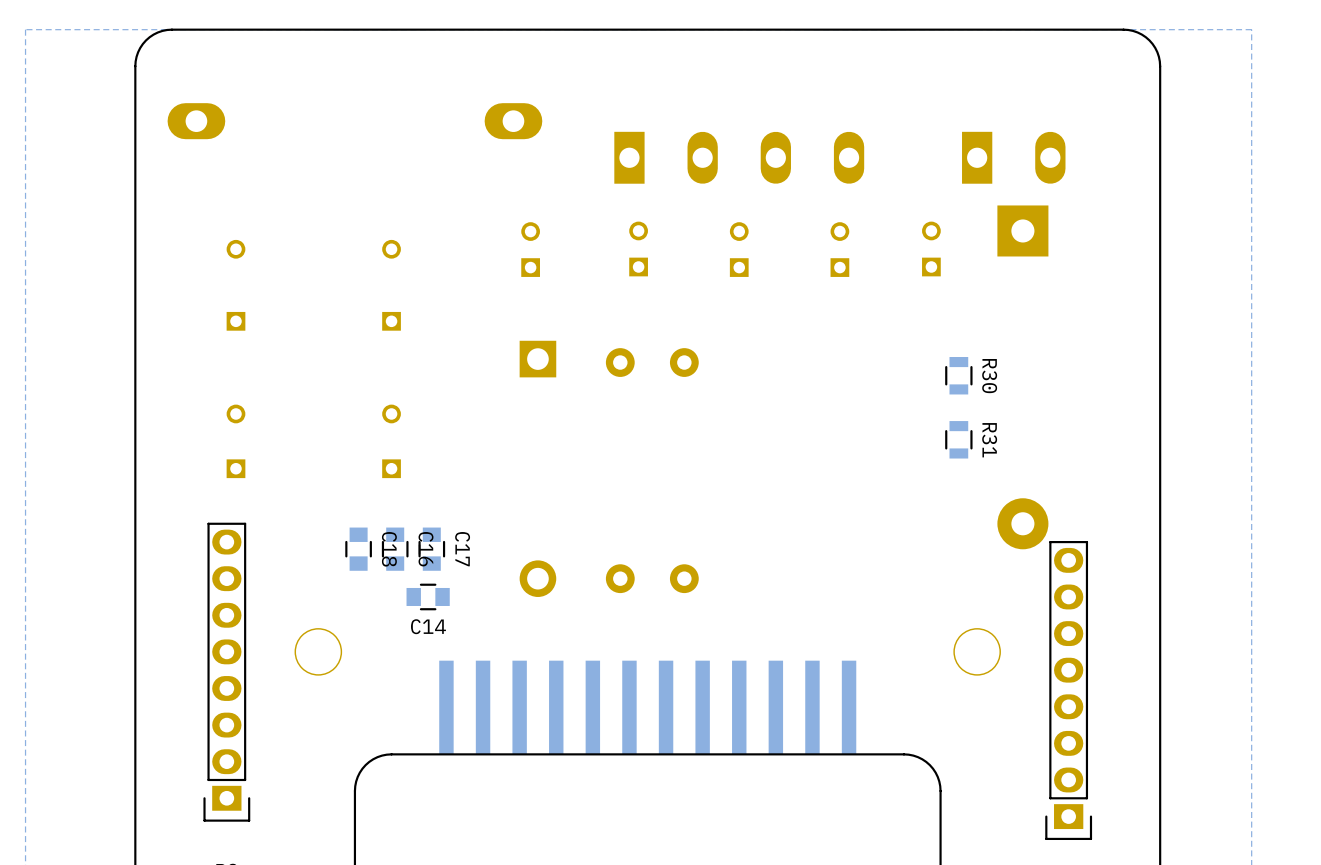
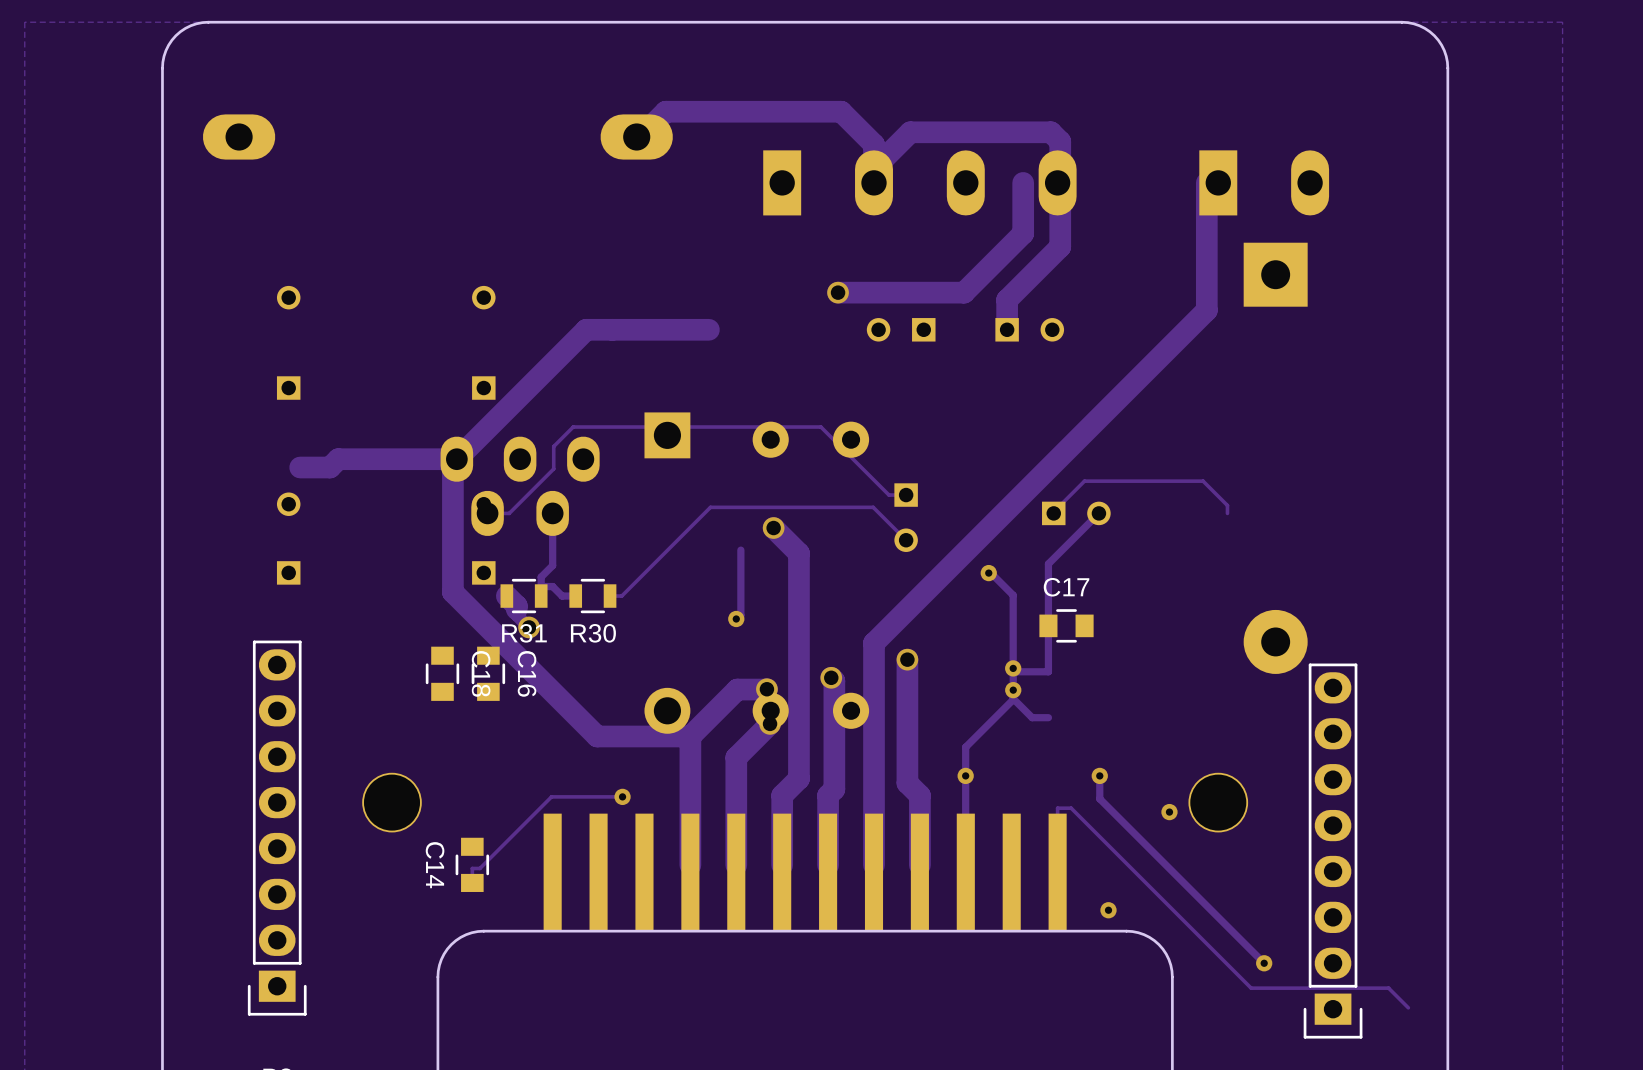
track: none -> (640, 136) (665, 111) (841, 111) (874, 144) (874, 182)
track: none -> (874, 168) (910, 132) (1050, 132) (1060, 141) (1060, 246) (1007, 299) (1007, 329)
track: none -> (1023, 182) (1023, 233) (964, 292) (838, 292)
track: none -> (1206, 182) (1206, 310) (874, 643) (874, 865)
via: none -> (838, 292)
part: (638, 248) -> none
part: (931, 248) -> none
part: (530, 249) -> none
part rotation: 0° (739, 249) -> 90° counterclockwise (901, 329)
part rotation: 0° (839, 249) -> 90° clockwise (1029, 329)
track: none -> (708, 329) (586, 329) (452, 463) (452, 592) (597, 736) (690, 736)
R30 rotation: 0° (958, 375) -> 90° clockwise (592, 596)
R30 position: (958, 375) -> (592, 596)
track: none -> (456, 459) (338, 459) (330, 467) (300, 467)
part: none -> (520, 486)
track: none -> (906, 495) (888, 495) (820, 427) (573, 427) (553, 446) (553, 468) (509, 513) (487, 513)
track: none -> (552, 513) (552, 565) (541, 577) (541, 596)
part: none -> (1076, 513)
track: none -> (1098, 513) (1048, 563) (1048, 671) (1016, 671) (1013, 668)
track: none -> (1227, 513) (1227, 505) (1203, 481) (1084, 481) (1053, 513)
part: none -> (906, 517)
track: none -> (773, 528) (798, 553) (798, 778) (782, 795) (782, 865)
via: none -> (773, 528)
R31 rotation: 0° (958, 439) -> 90° clockwise (524, 596)
R31 position: (958, 439) -> (524, 596)
track: none -> (906, 540) (873, 507) (710, 507) (621, 596) (610, 596)
track: none -> (740, 550) (740, 615) (736, 618)
track: none -> (988, 573) (1013, 595) (1013, 699) (965, 747) (965, 865)
via: none -> (988, 573)
track: none -> (541, 586) (552, 586) (562, 596) (575, 596)
track: none -> (506, 596) (516, 605) (516, 615) (529, 627)
via: none -> (736, 618)
via: none -> (529, 627)
track: none -> (907, 659) (907, 783) (919, 795) (919, 865)
via: none -> (907, 659)
via: none -> (1013, 668)
C17 rotation: 0° (431, 549) -> 90° clockwise (1066, 625)
C17 position: (431, 549) -> (1066, 625)
C17 name position: C17 (462, 549) -> C17 (1066, 587)
track: none -> (831, 677) (834, 680) (834, 789) (828, 795) (828, 865)
via: none -> (831, 677)
track: none -> (766, 689) (737, 689) (690, 736)
via: none -> (766, 689)
via: none -> (1013, 690)
track: none -> (1013, 698) (1032, 717) (1048, 717)
track: none -> (770, 723) (736, 757) (736, 865)
via: none -> (770, 723)
C14 rotation: 0° (428, 596) -> 90° clockwise (472, 864)
C14 position: (428, 596) -> (472, 864)
track: none -> (690, 736) (690, 865)
via: none -> (965, 775)
track: none -> (1099, 775) (1099, 798) (1264, 963)
via: none -> (1099, 775)
track: none -> (622, 796) (551, 796) (479, 868) (472, 868) (472, 882)
via: none -> (622, 796)
via: none -> (1169, 812)
track: none -> (1057, 865) (1057, 808) (1071, 808) (1251, 988) (1388, 988) (1408, 1007)
via: none -> (1108, 910)
via: none -> (1264, 963)

